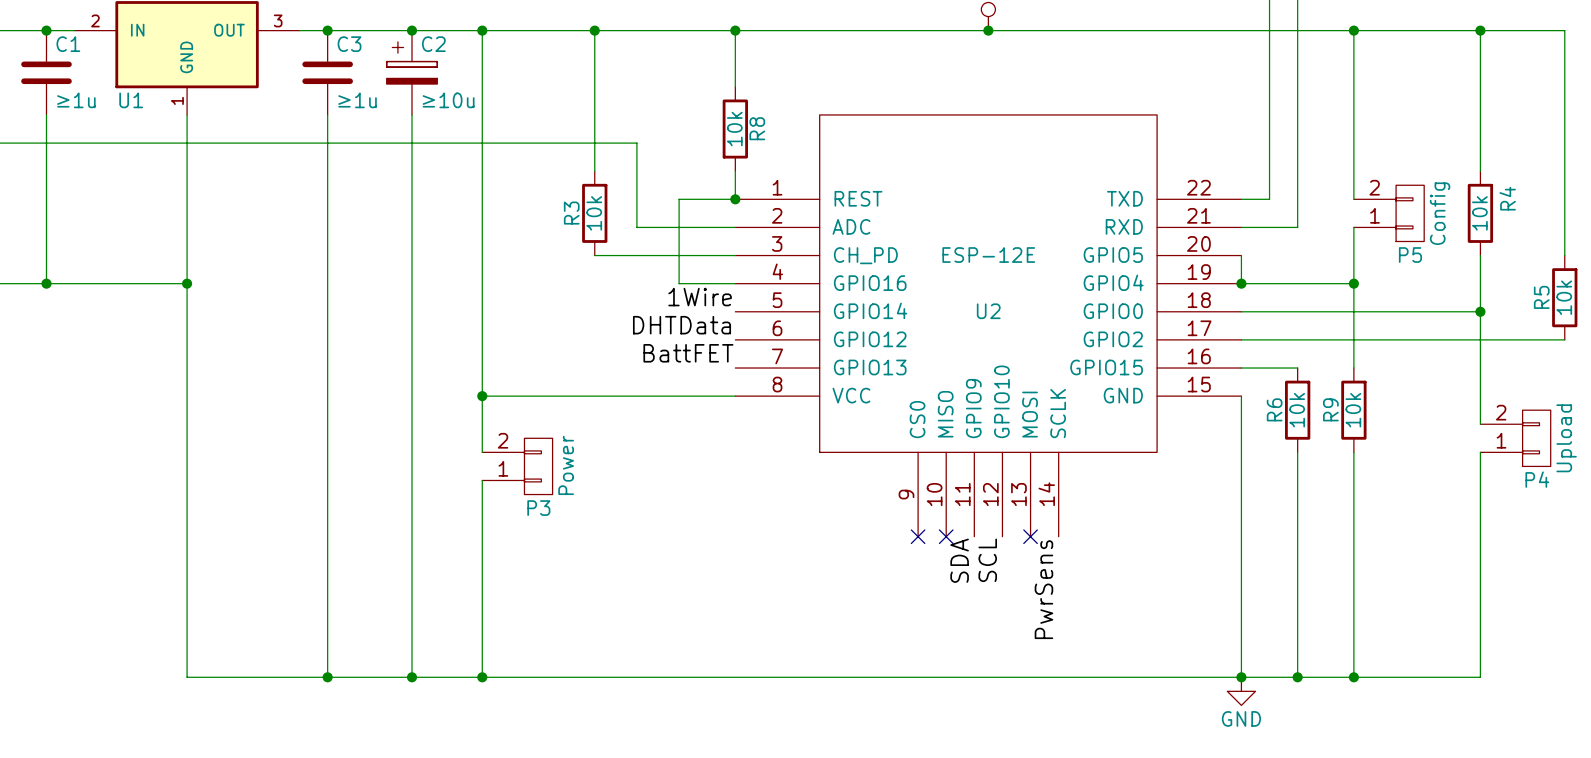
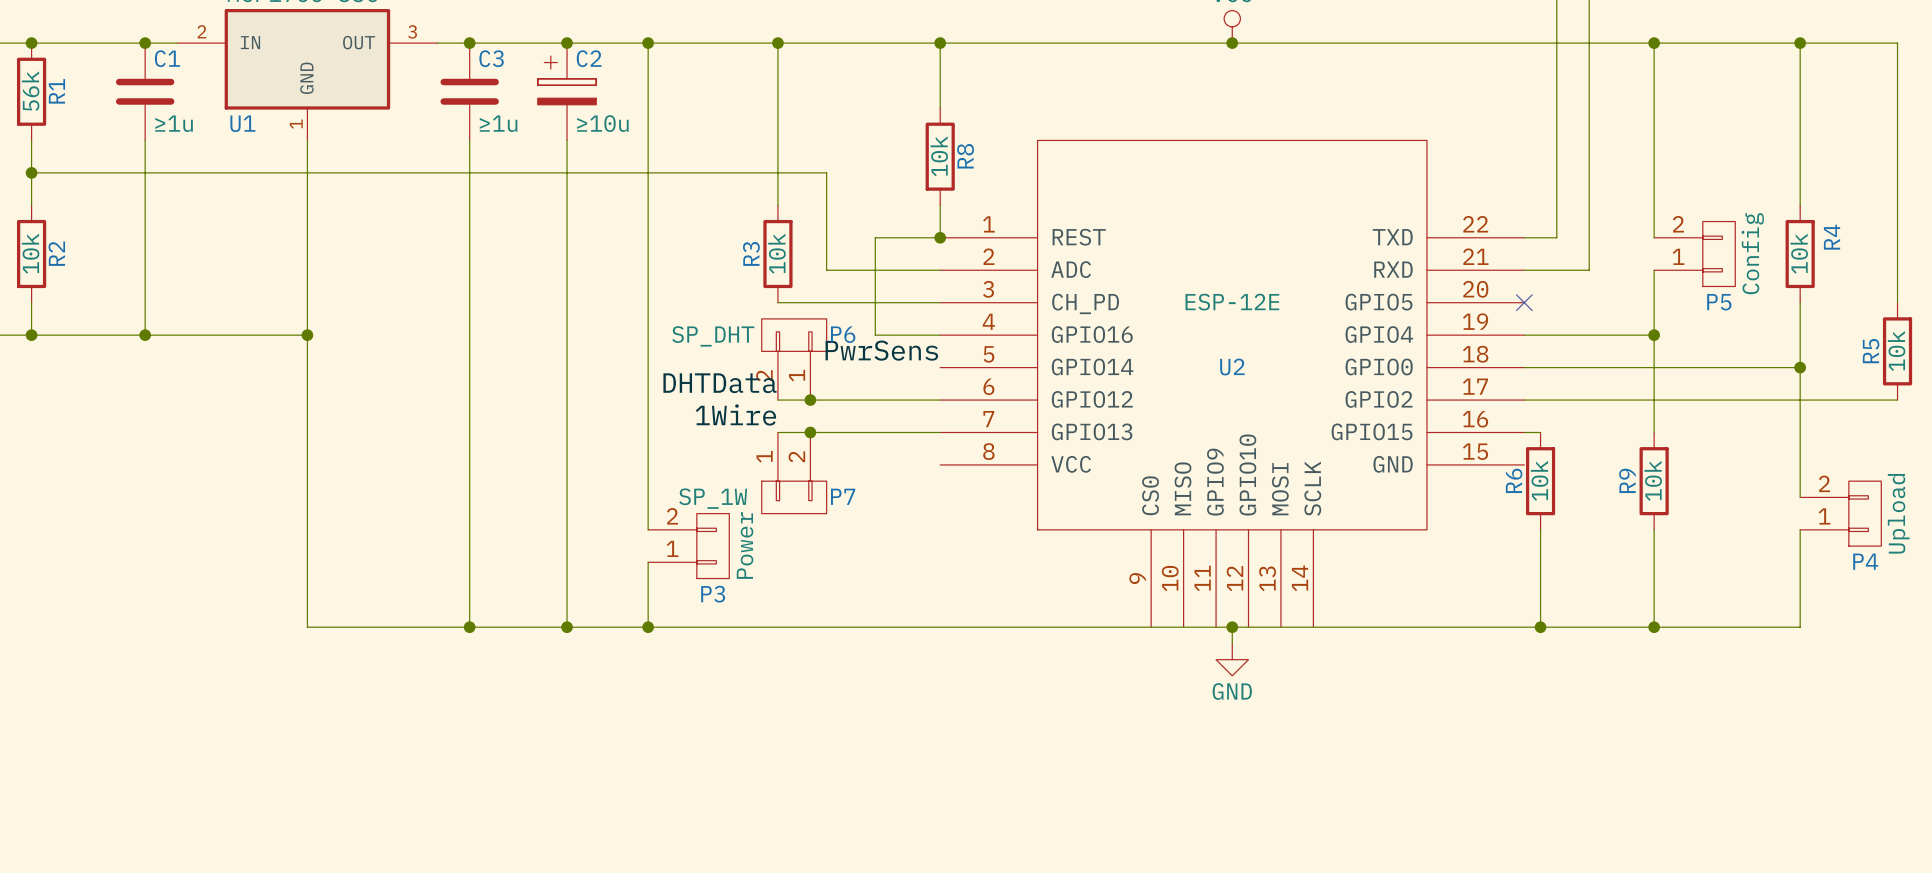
wire: (1241, 255) (1241, 283) -> none
no-connect mark: none -> (1524, 302)
junction: (1241, 283) -> none
label: 1Wire (700, 297) -> PwrSens (881, 350)
P6: none -> SP_DHT (794, 359)
label position: DHTData (682, 325) -> DHTData (720, 383)
wire: none -> (777, 400) (940, 400)
junction: none -> (810, 400)
label: none -> 1Wire (735, 414)
label: BattFET (688, 353) -> none
wire: none -> (777, 432) (940, 432)
junction: none -> (810, 432)
wire: (1255, 368) (1297, 368) -> none
wire: (482, 396) (735, 396) -> none
junction: (482, 396) -> none
wire: (1241, 396) (1241, 677) -> none
P7: none -> SP_1W (794, 473)
R6 position: (1297, 410) -> (1540, 481)
wire: none -> (1540, 529) (1540, 627)
wire: (1297, 452) (1297, 677) -> none
wire: (187, 536) (187, 677) (1480, 677) (1480, 536) -> (307, 627) (1800, 627)
wire: (327, 536) (327, 677) -> none
junction: none -> (469, 627)
wire: (412, 536) (412, 677) -> none
junction: none -> (567, 627)
wire: (482, 536) (482, 677) -> none
junction: none -> (648, 627)
no-connect mark: (918, 536) -> none
no-connect mark: (946, 536) -> none
wire: none -> (1232, 627) (1232, 643)
junction: none -> (1232, 627)
no-connect mark: (1030, 536) -> none
junction: none -> (1540, 627)
wire: (1353, 536) (1353, 677) -> none
junction: none -> (1654, 627)
label: SDA (959, 560) -> none
label: SCL (987, 560) -> none
power symbol: none -> GND (1232, 659)
label: PwrSens (1043, 589) -> none
junction: (327, 677) -> none
junction: (412, 677) -> none
junction: (482, 677) -> none
junction: (1241, 677) -> none
junction: (1297, 677) -> none
junction: (1353, 677) -> none
power symbol: GND (1241, 691) -> none

